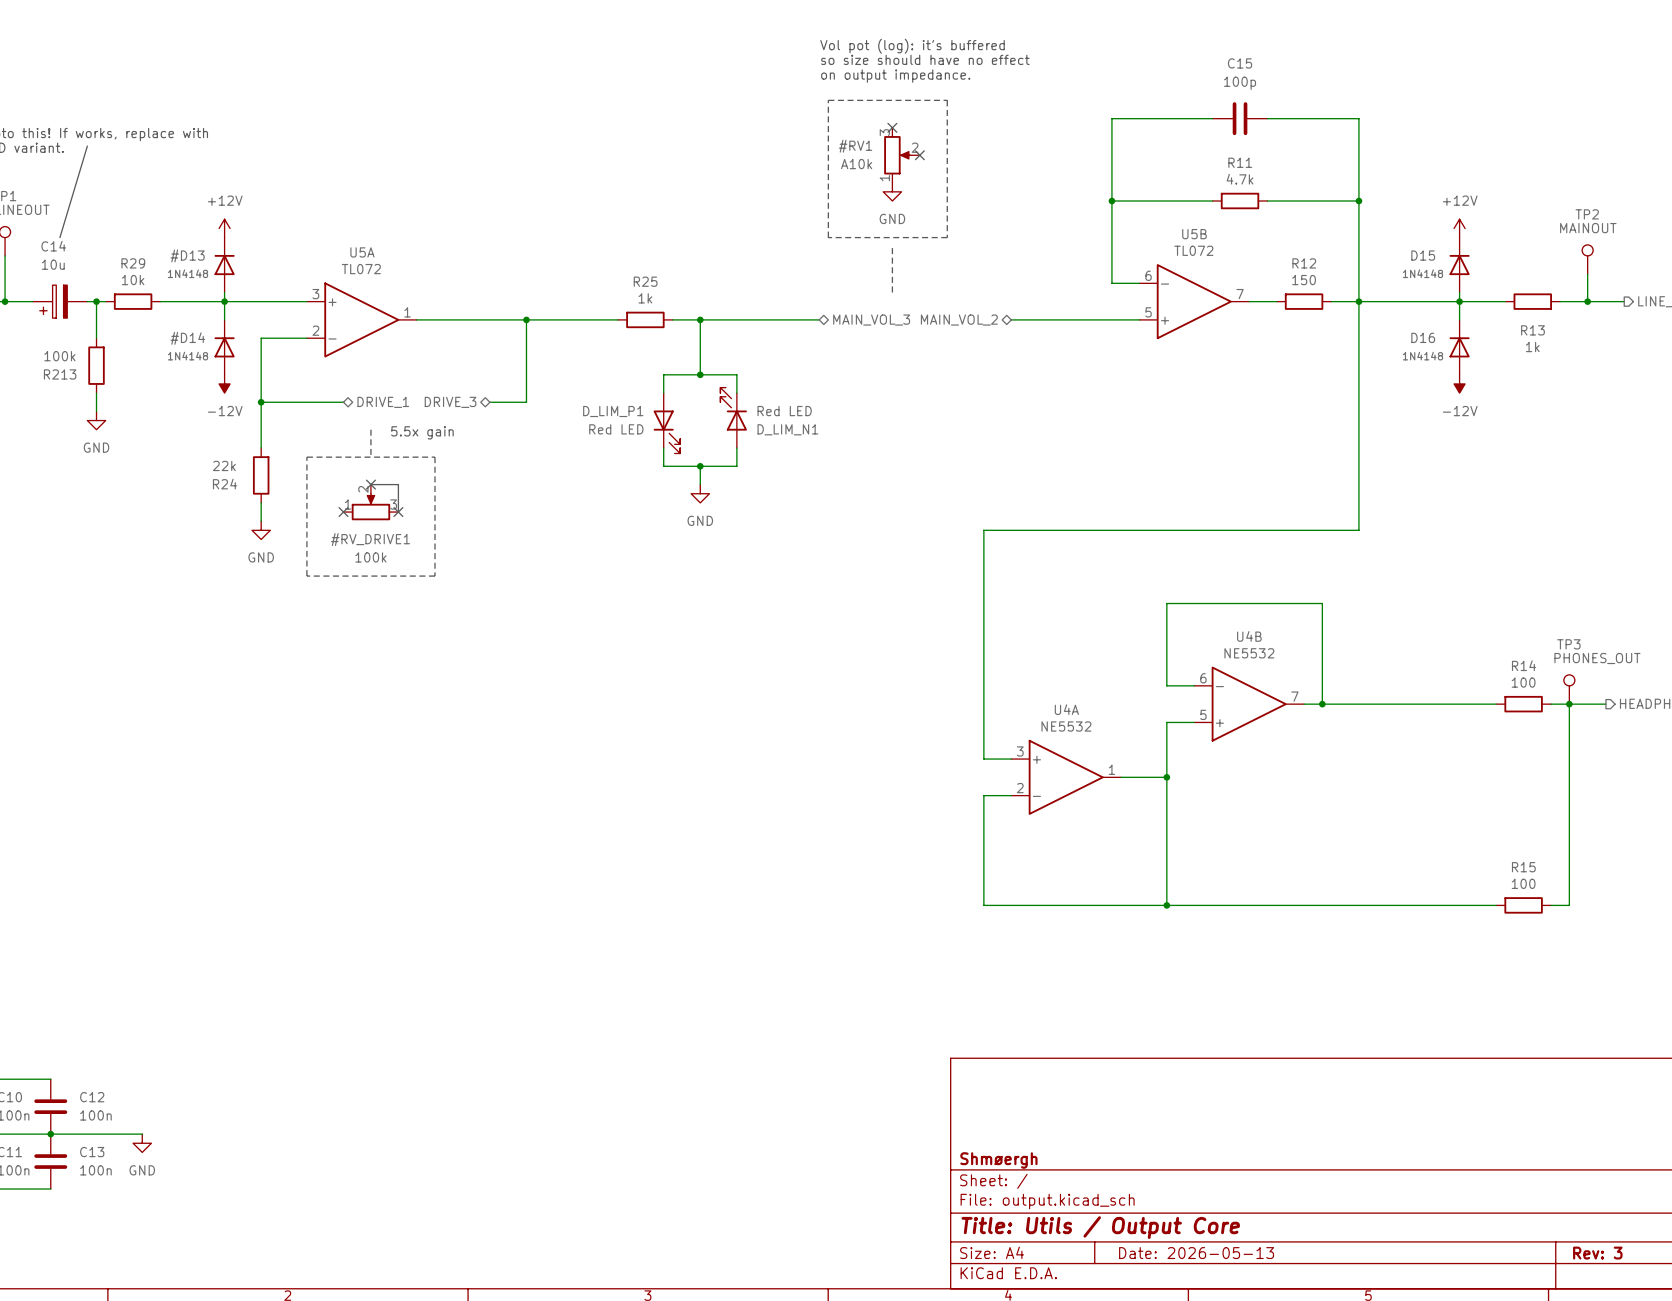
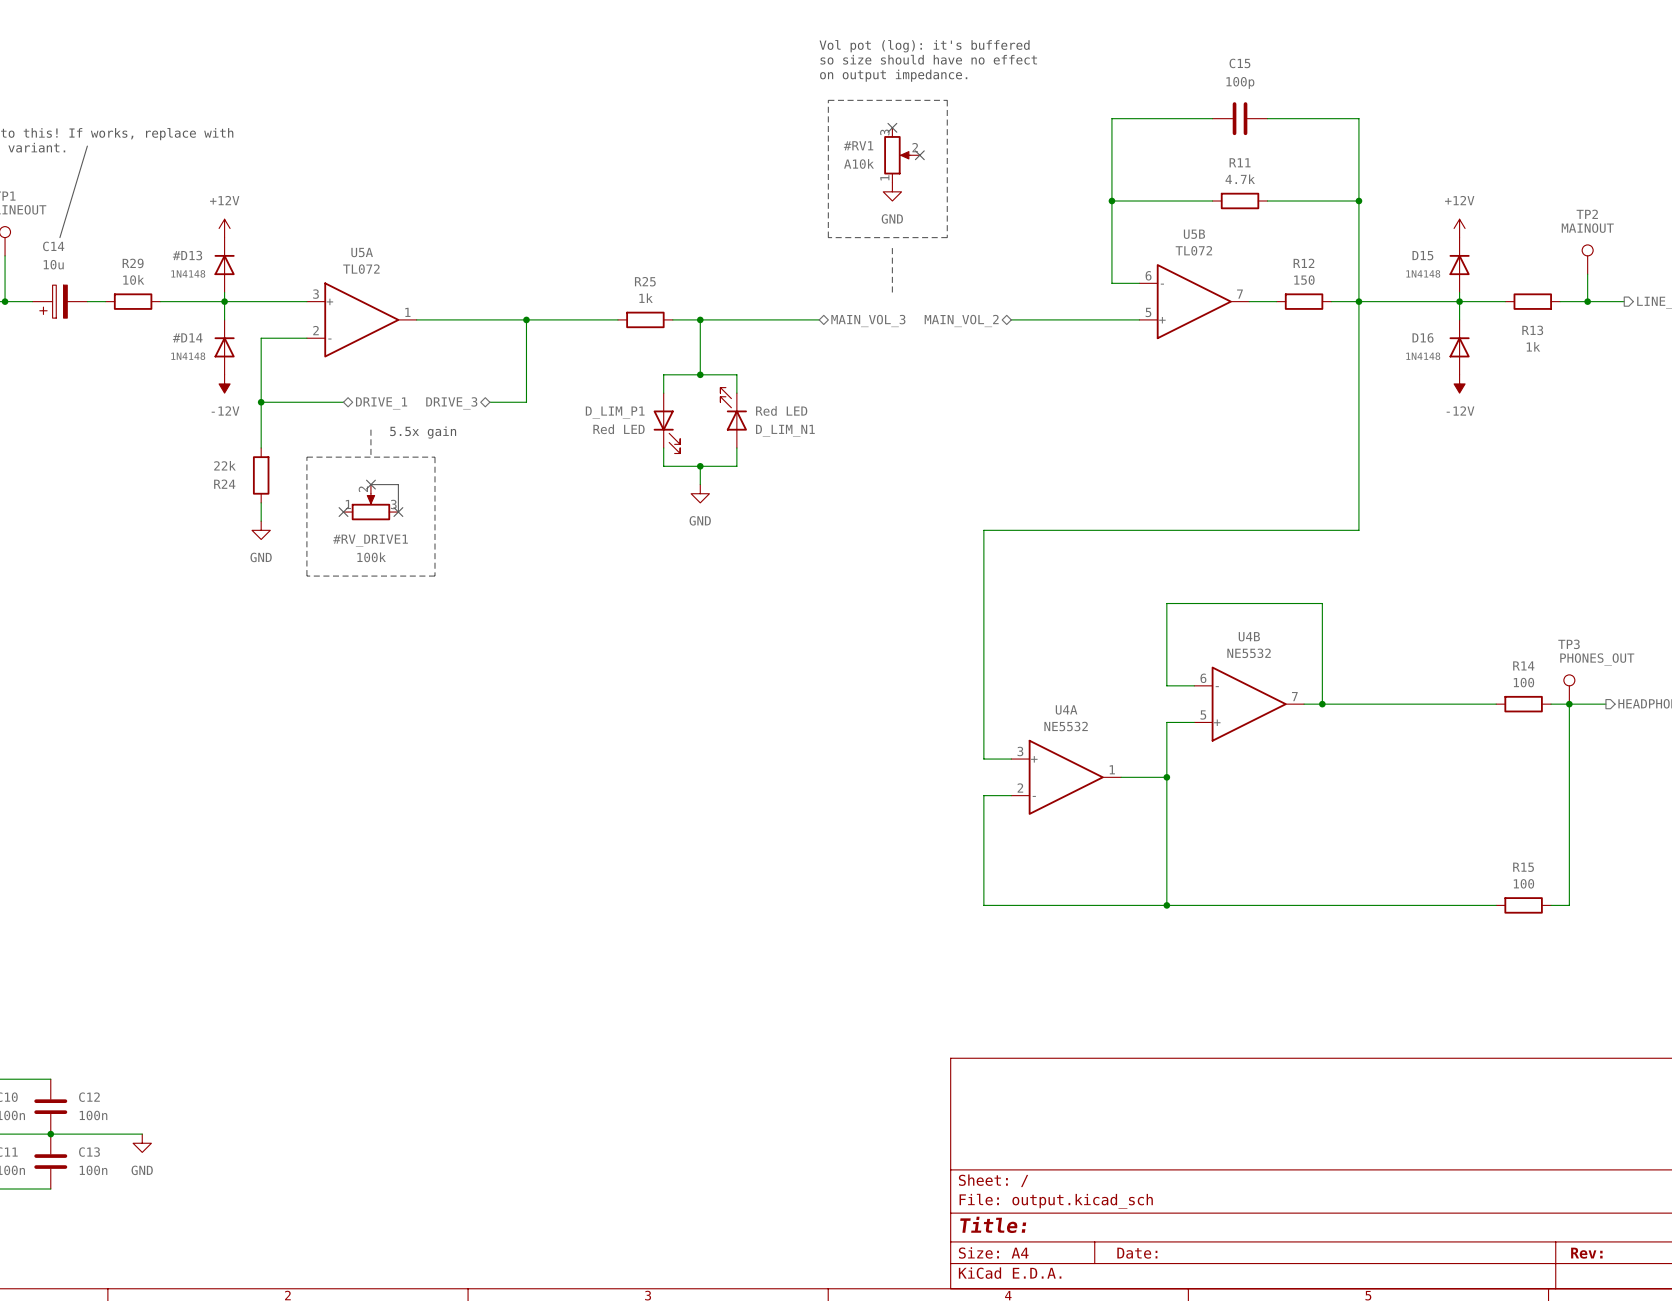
wire: (96, 301) (96, 338) -> none
junction: (96, 301) -> none
R213: 100k (96, 365) -> none
wire: (96, 393) (96, 411) -> none
power symbol: GND (96, 420) -> none
title block: Shmøergh (998, 1160) -> none
title block: Title: Utils / Output Core (1100, 1227) -> Title: (993, 1224)
title block: Date: 2026-05-13 (1196, 1253) -> Date: (1137, 1253)
title block: Rev: 3 (1597, 1253) -> Rev: (1586, 1253)

